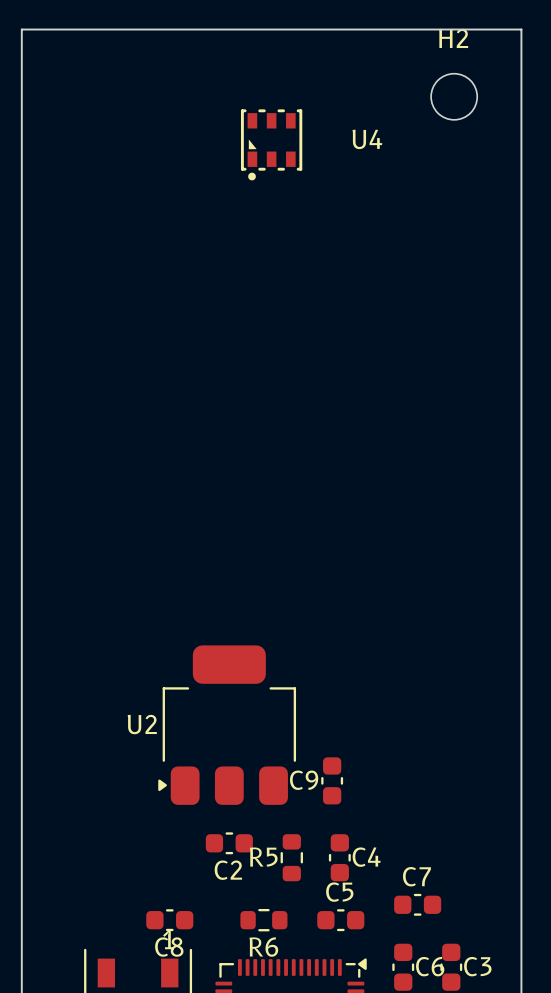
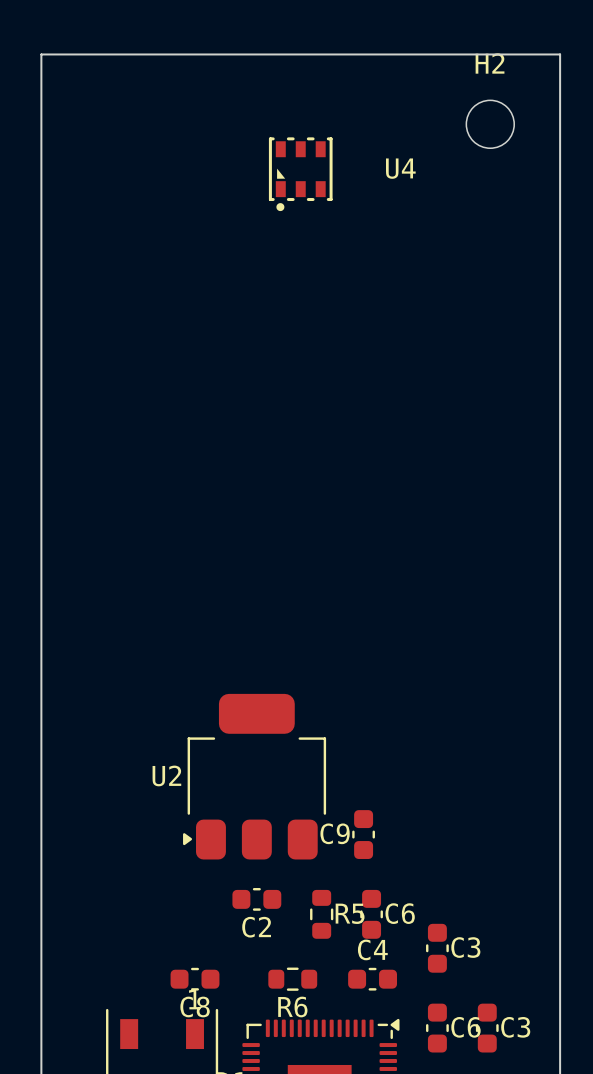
R5 name position: R5 (263, 857) -> R5 (350, 913)
C4 name: C4 (366, 857) -> C6 (400, 913)
C3: none -> (437, 948)
C5 name: C5 (339, 892) -> C4 (372, 949)
C7: (417, 904) -> none

